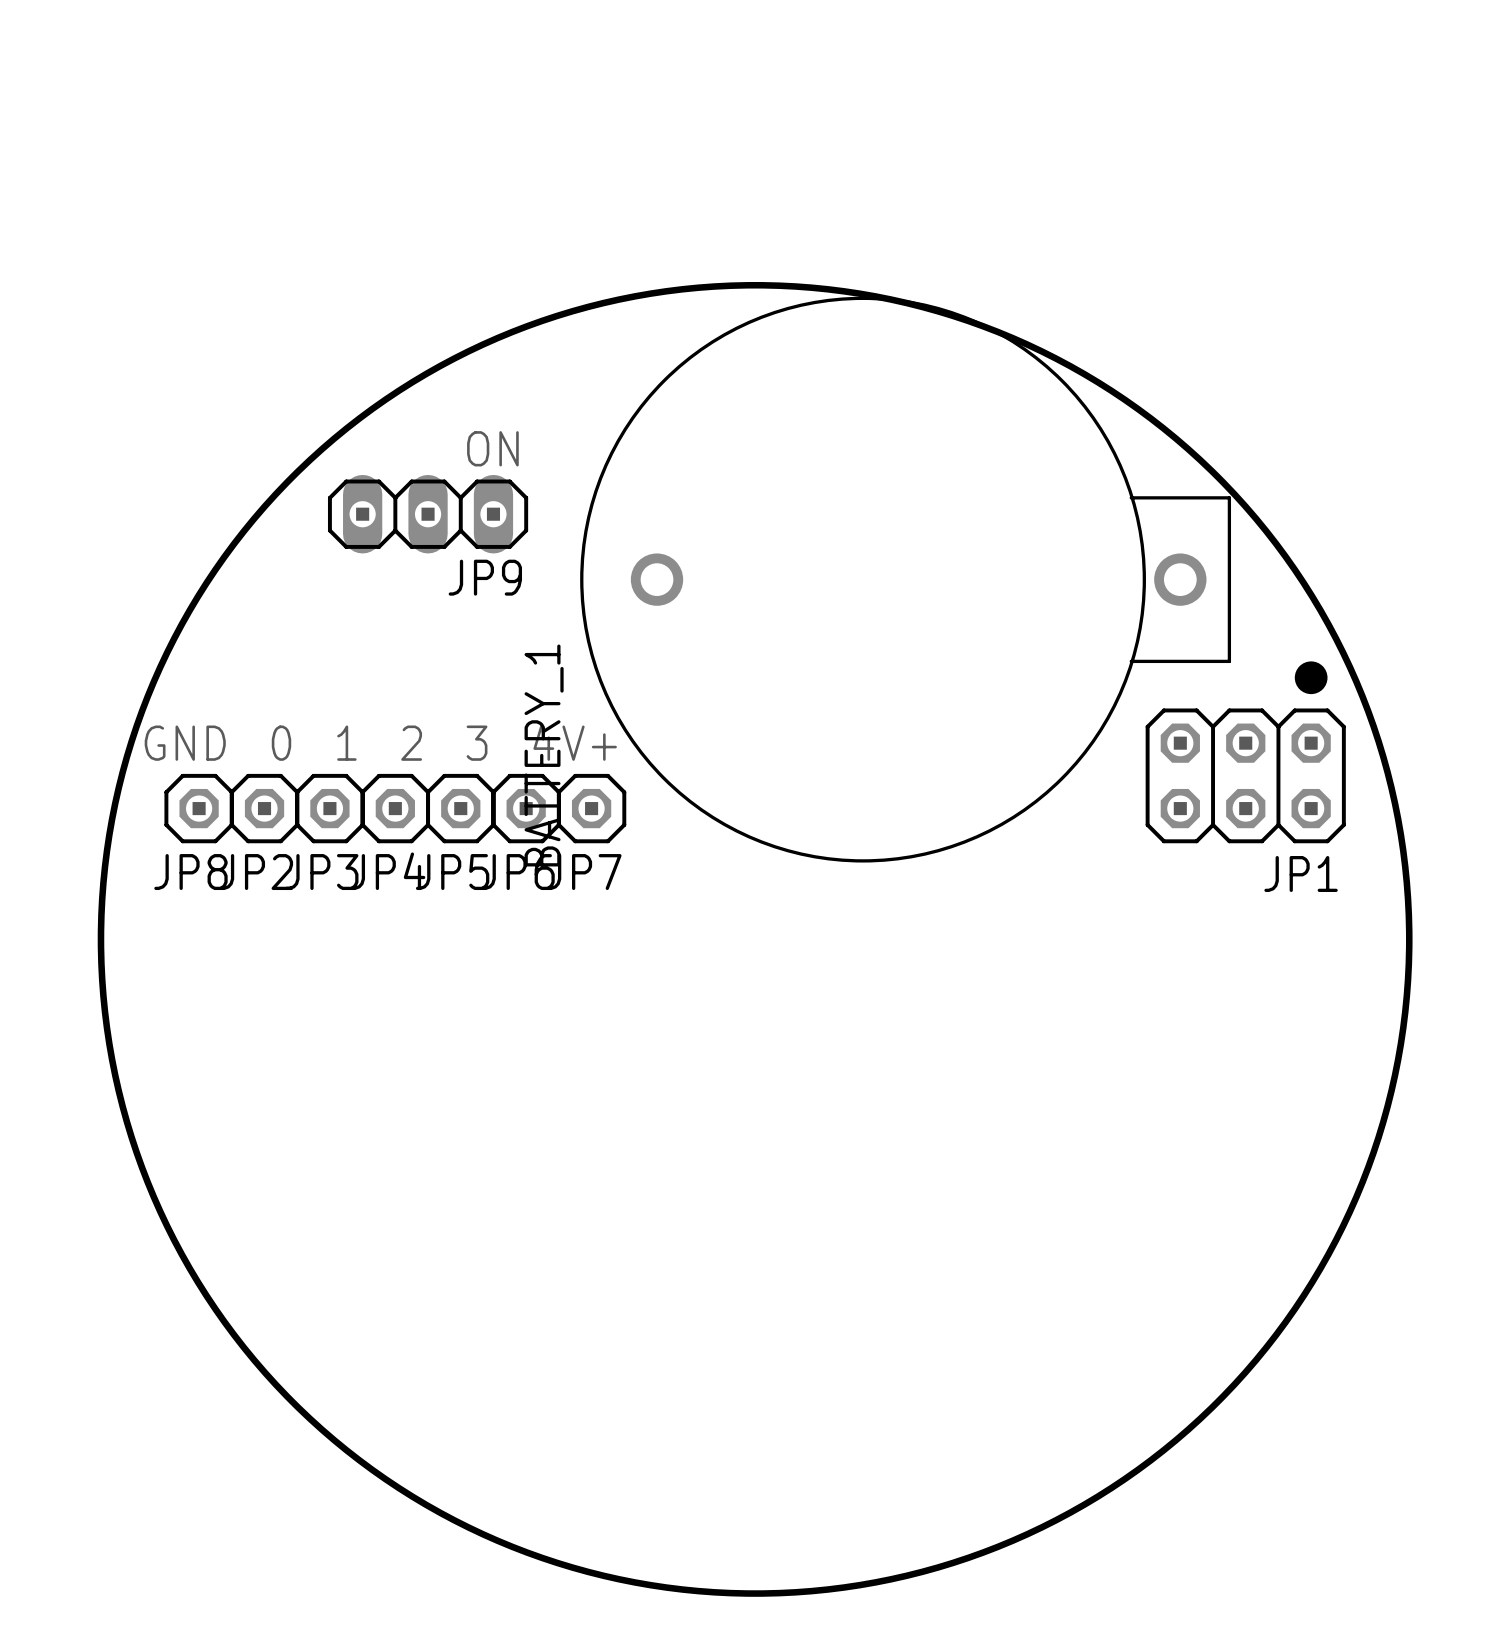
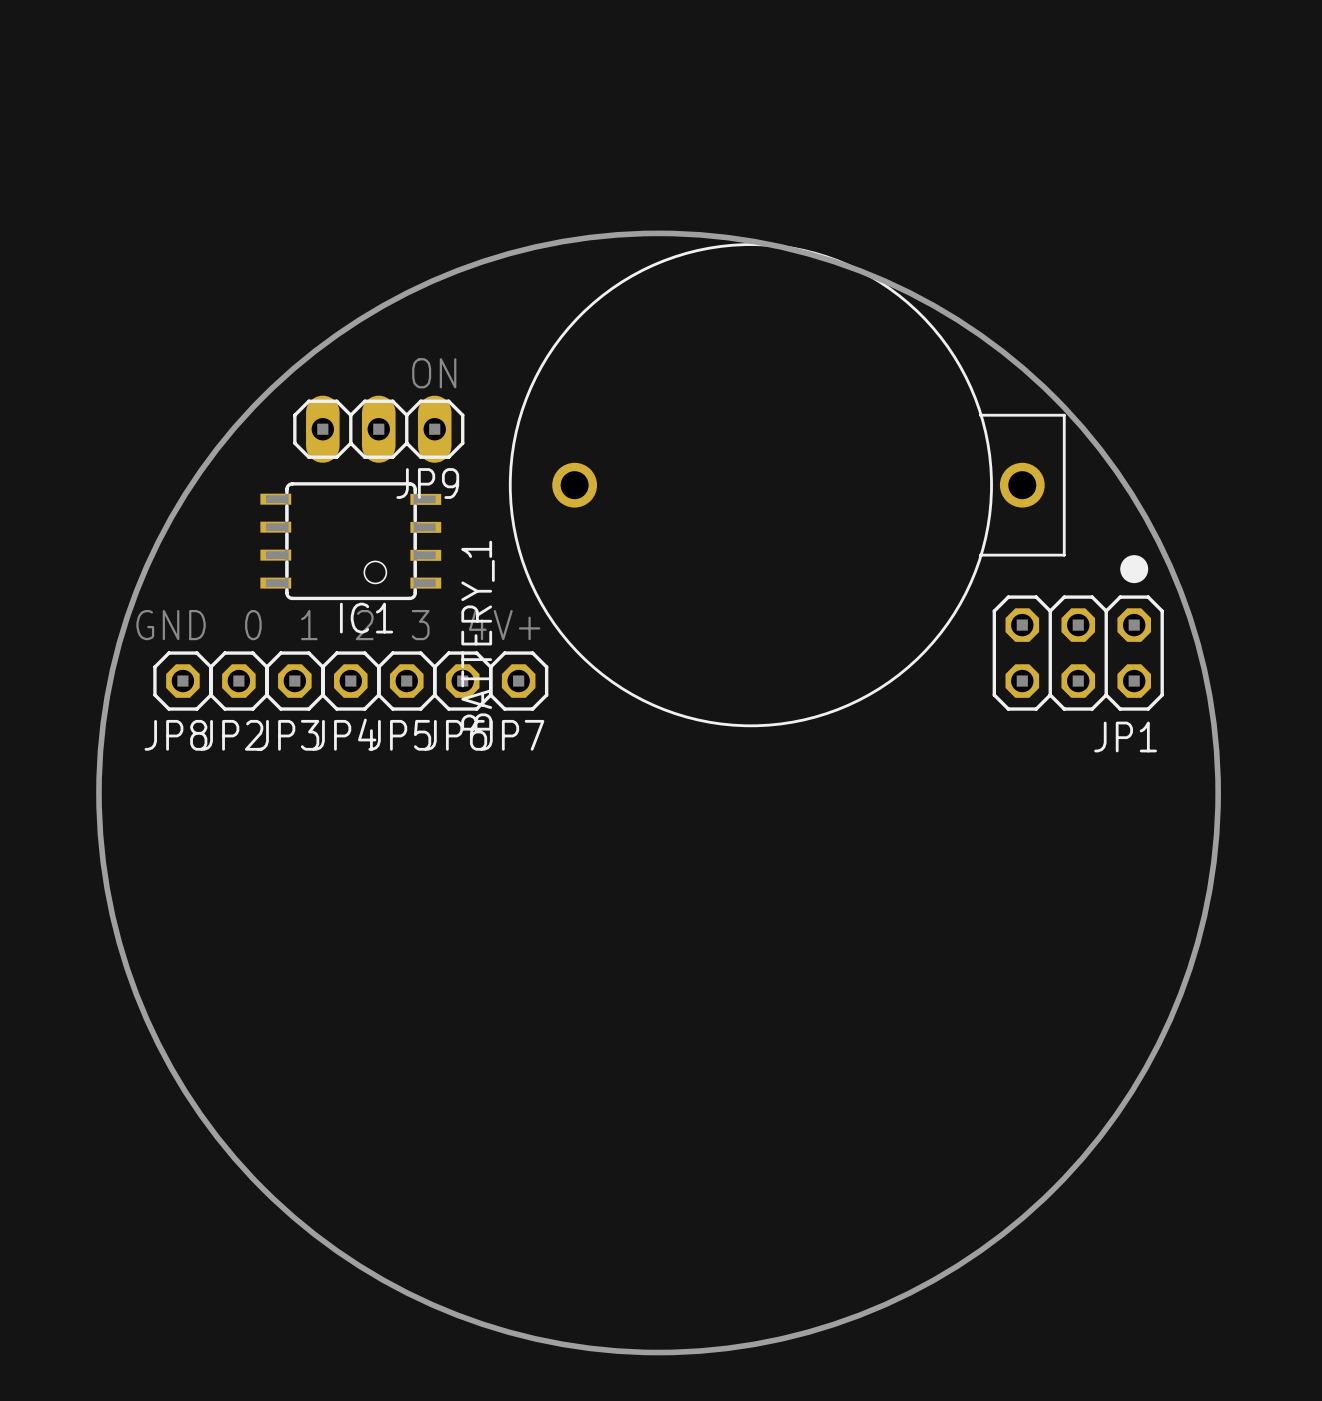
IC1: none -> (350, 541)

